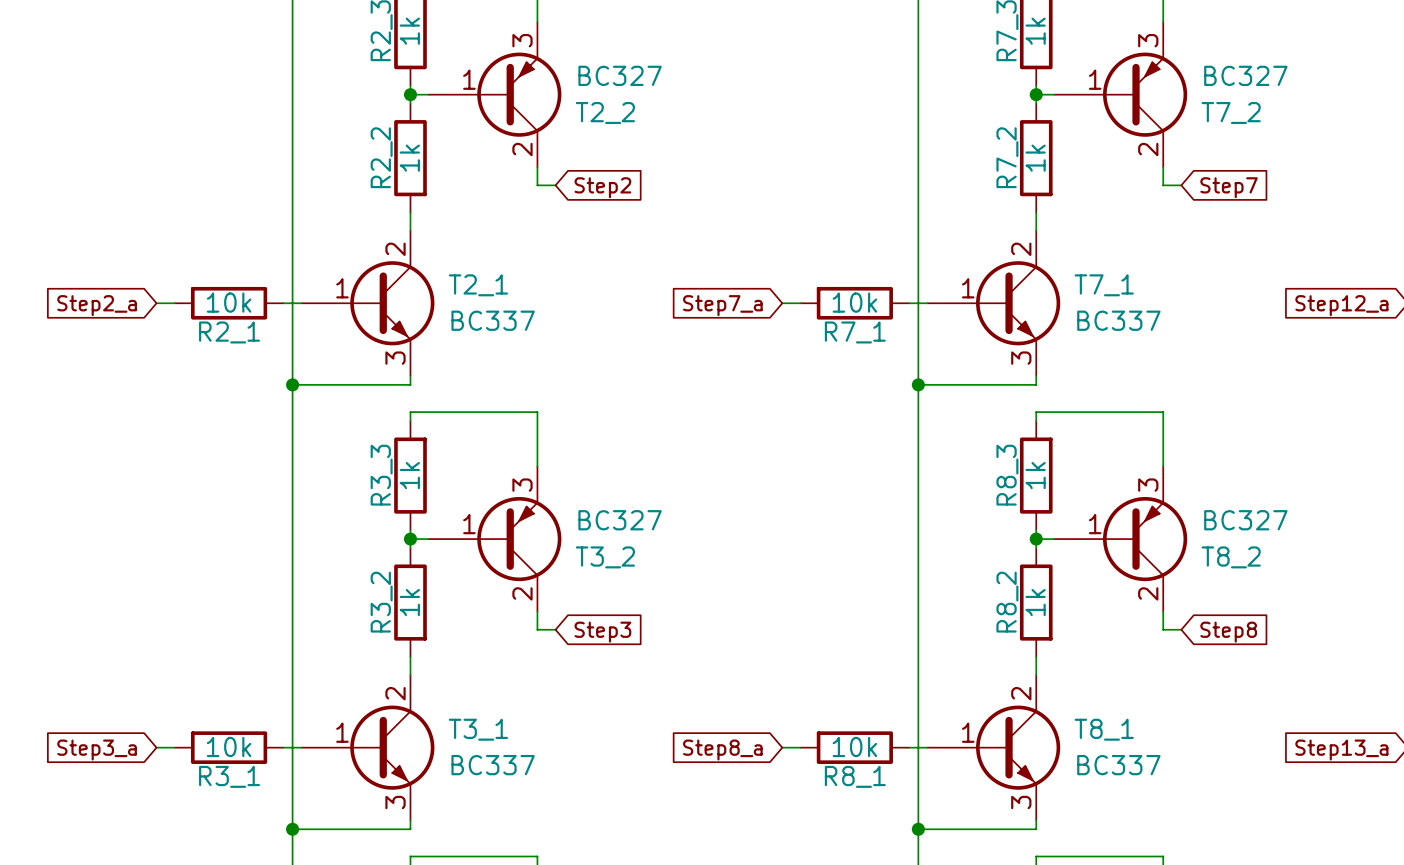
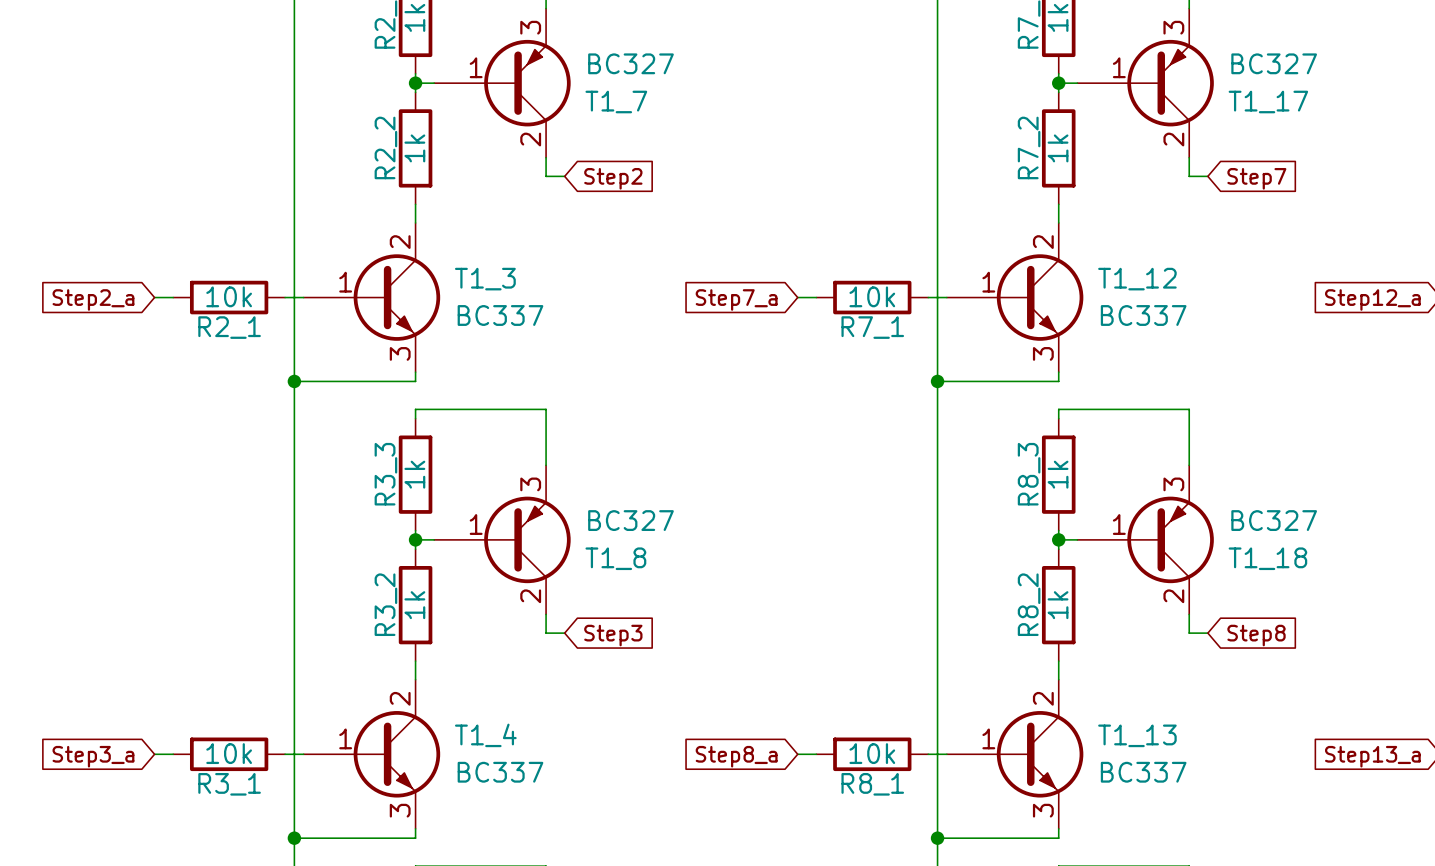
T2_2 name: T2_2 (605, 112) -> T1_7 (616, 101)
T7_2 name: T7_2 (1231, 112) -> T1_17 (1268, 101)
T2_1 name: T2_1 (478, 285) -> T1_3 (485, 279)
T7_1 name: T7_1 (1104, 285) -> T1_12 (1137, 279)
T3_2 name: T3_2 (605, 557) -> T1_8 (615, 558)
T8_2 name: T8_2 (1231, 557) -> T1_18 (1267, 558)
T3_1 name: T3_1 (478, 729) -> T1_4 (485, 735)
T8_1 name: T8_1 (1104, 729) -> T1_13 (1137, 735)

